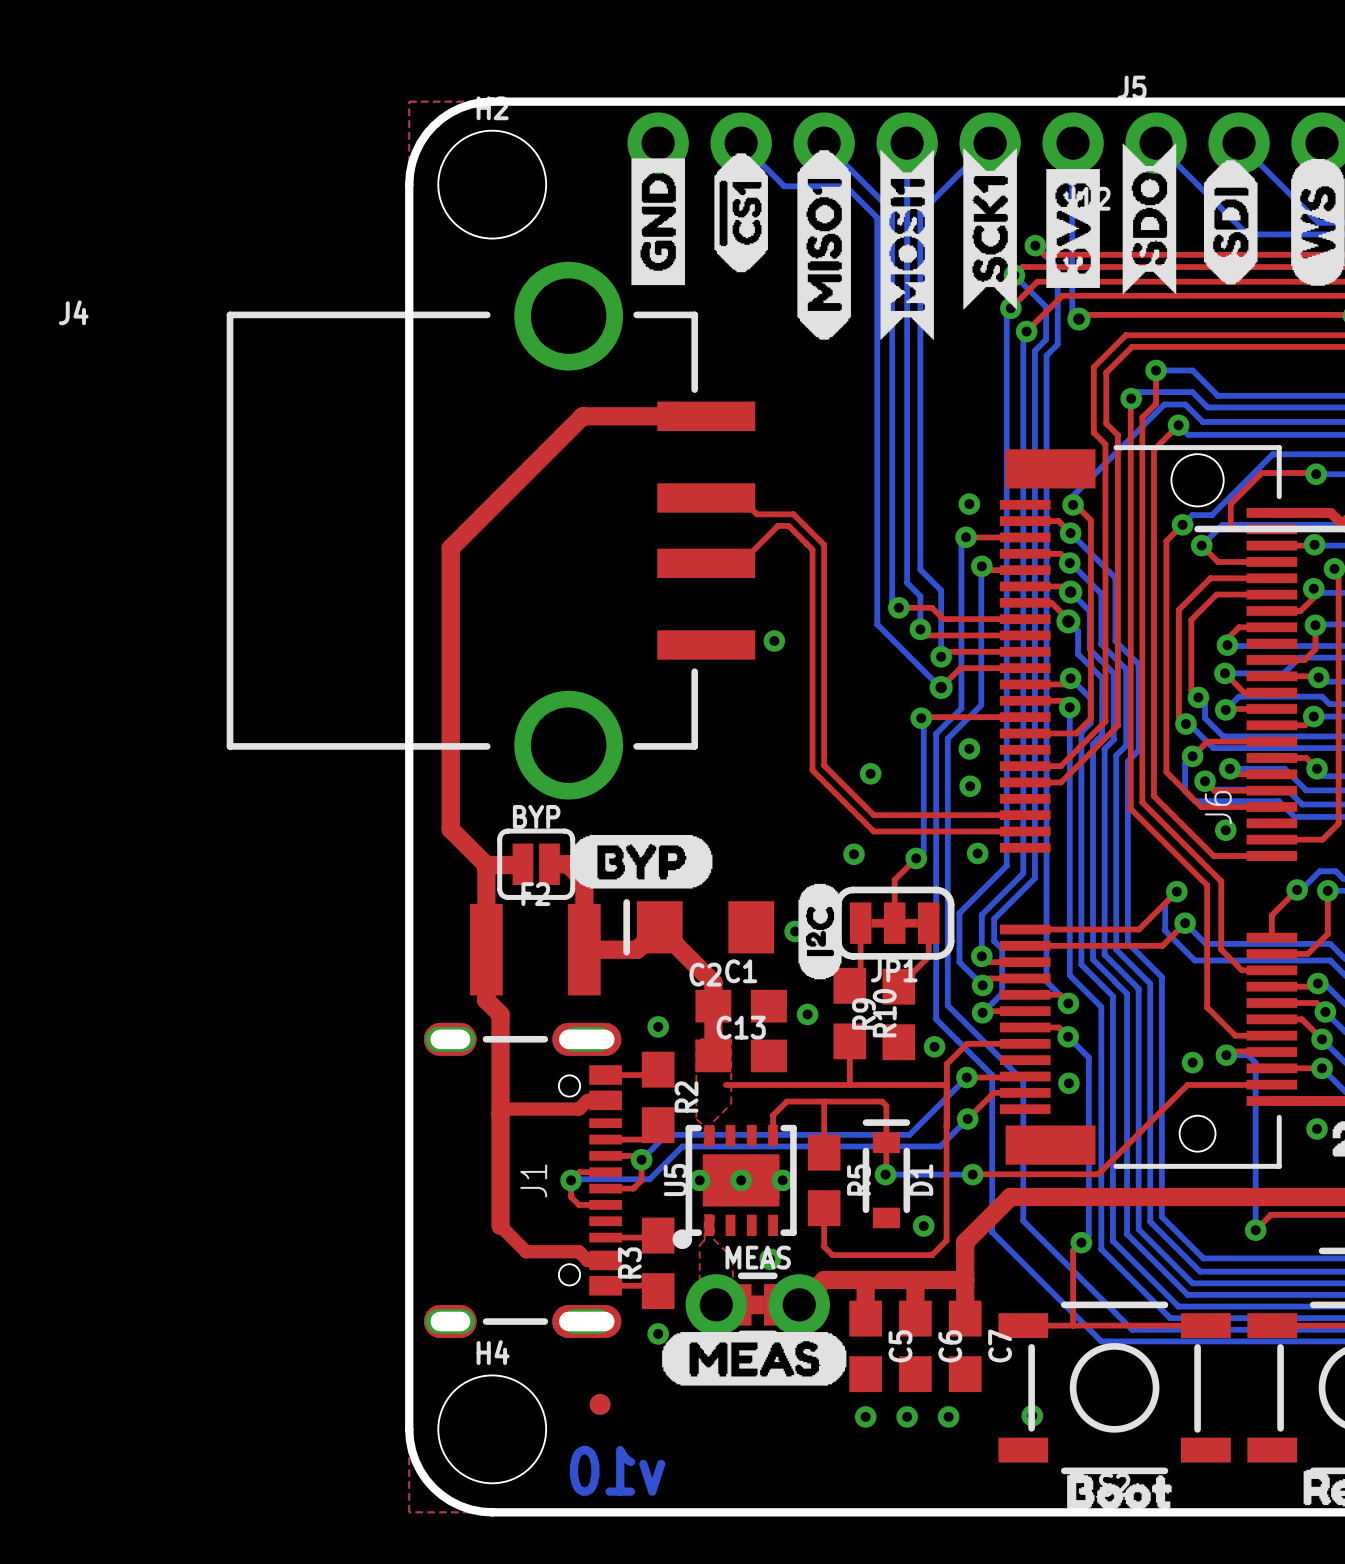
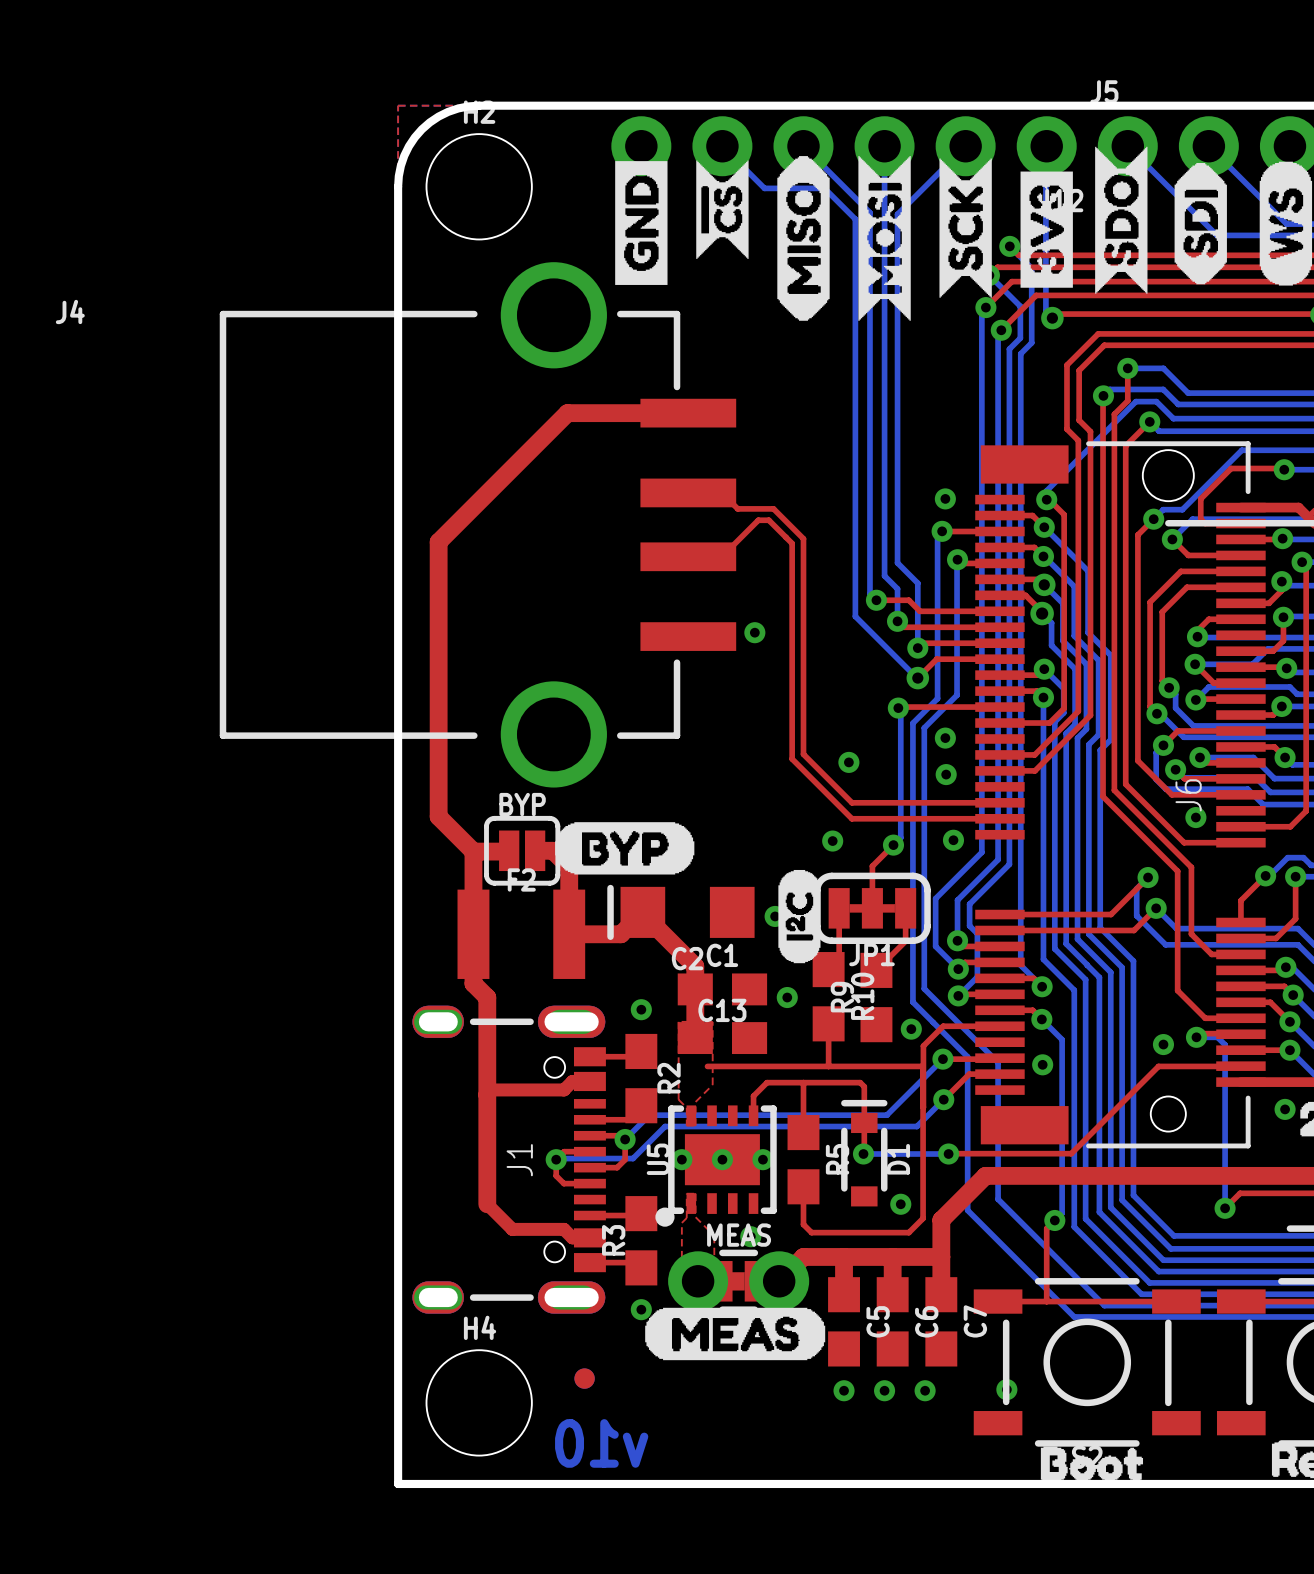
drawing shape: [963, 148, 1017, 310] -> [939, 158, 992, 298]
drawing shape: [797, 150, 851, 340] -> [777, 156, 830, 321]
drawing shape: [880, 150, 934, 340] -> [858, 156, 911, 321]
drawing shape: [714, 153, 768, 273] -> [696, 160, 749, 259]
board edge: (409, 1429) (415, 1461) (433, 1488) (460, 1506) (492, 1512) -> (398, 1402) (398, 1483) (479, 1483)

